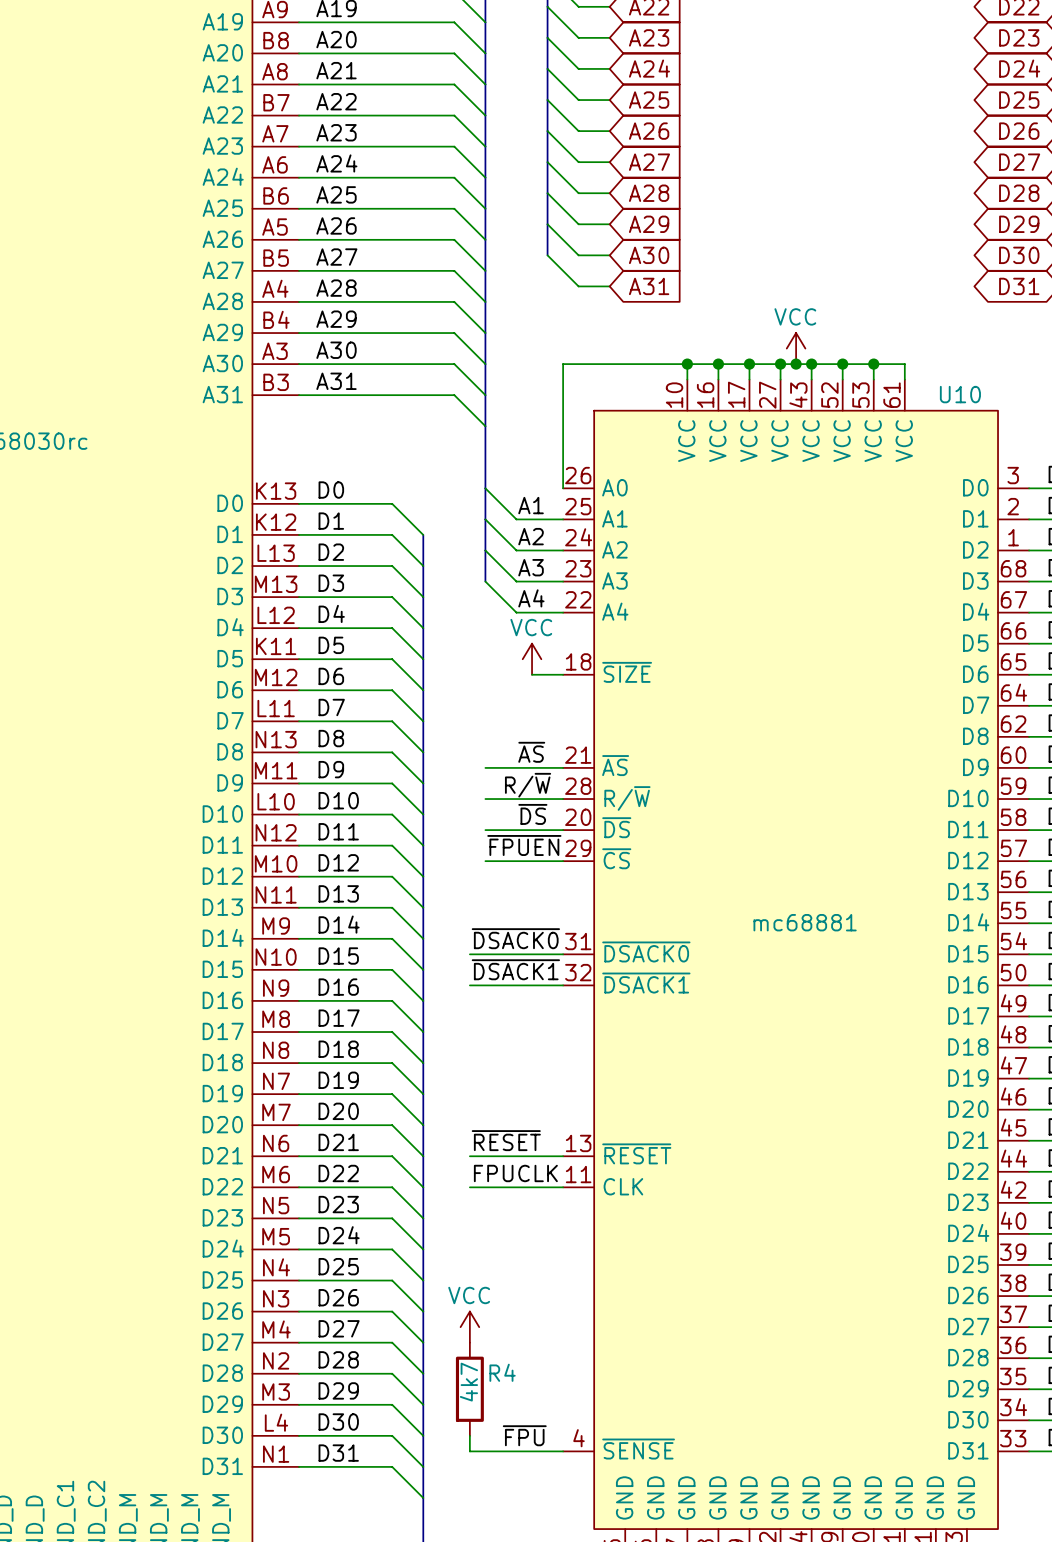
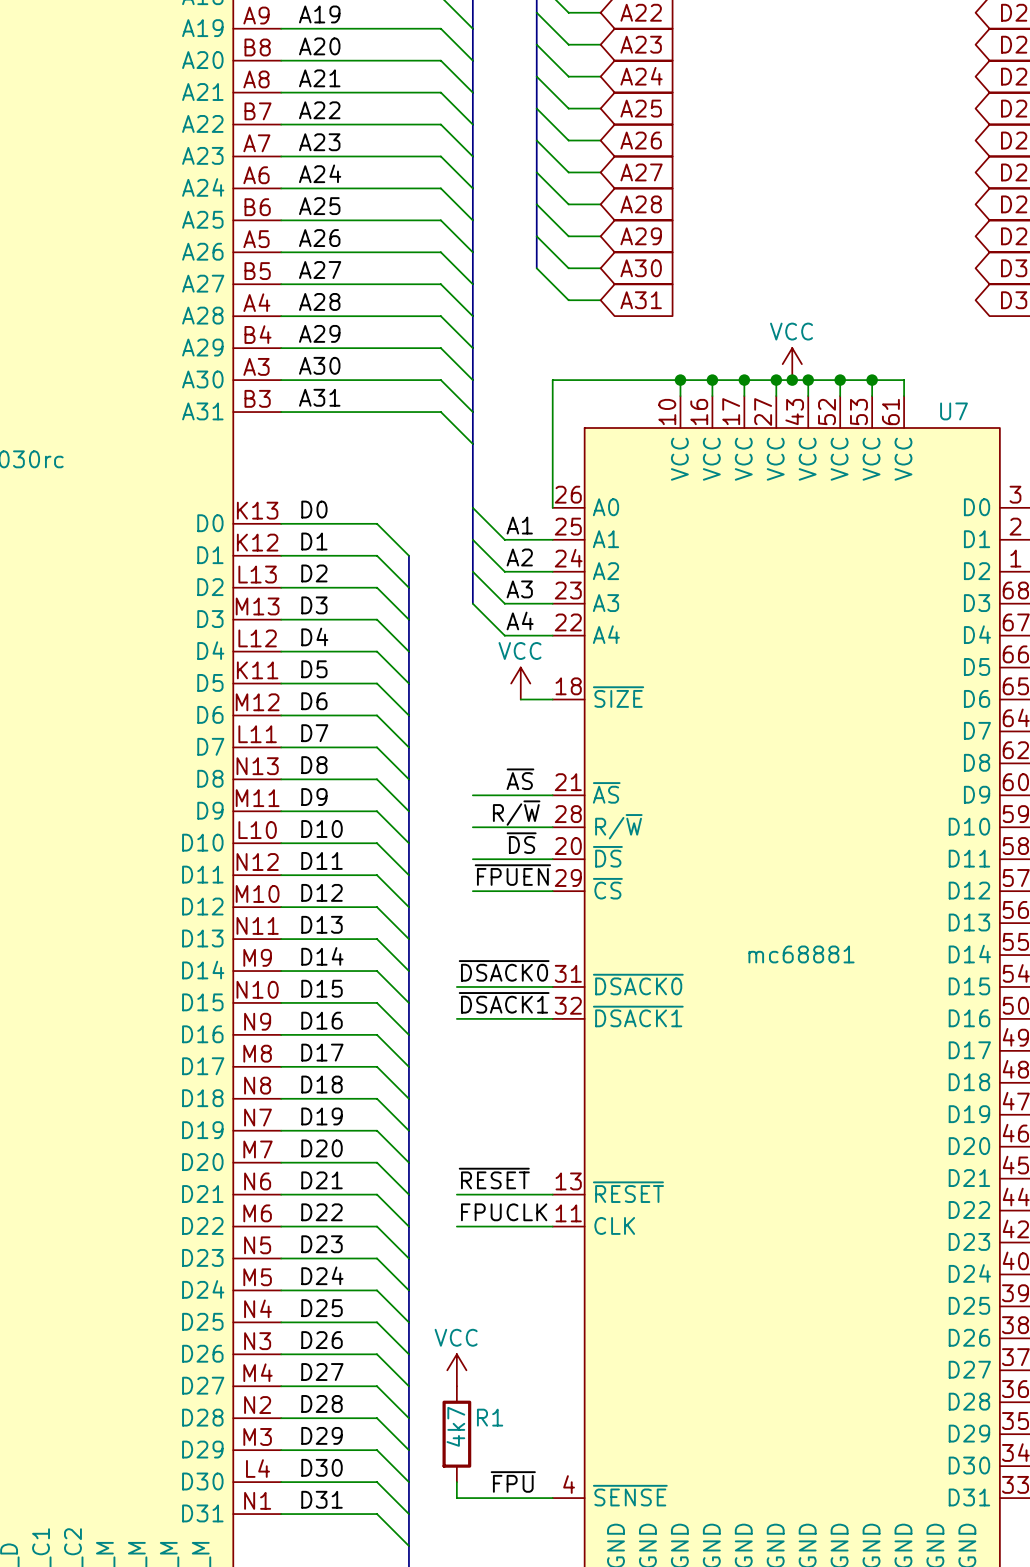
U10 name: U10 (960, 394) -> U7 (954, 411)
R4 name: R4 (502, 1372) -> R1 (490, 1417)

